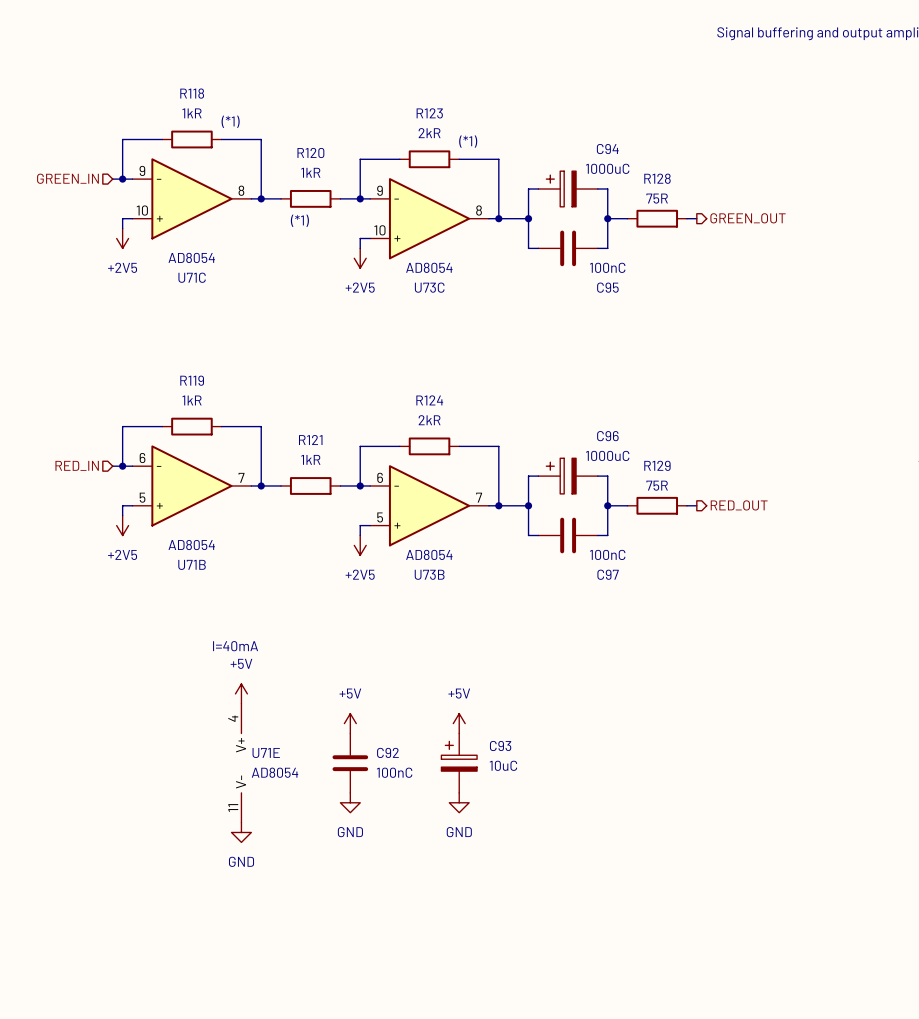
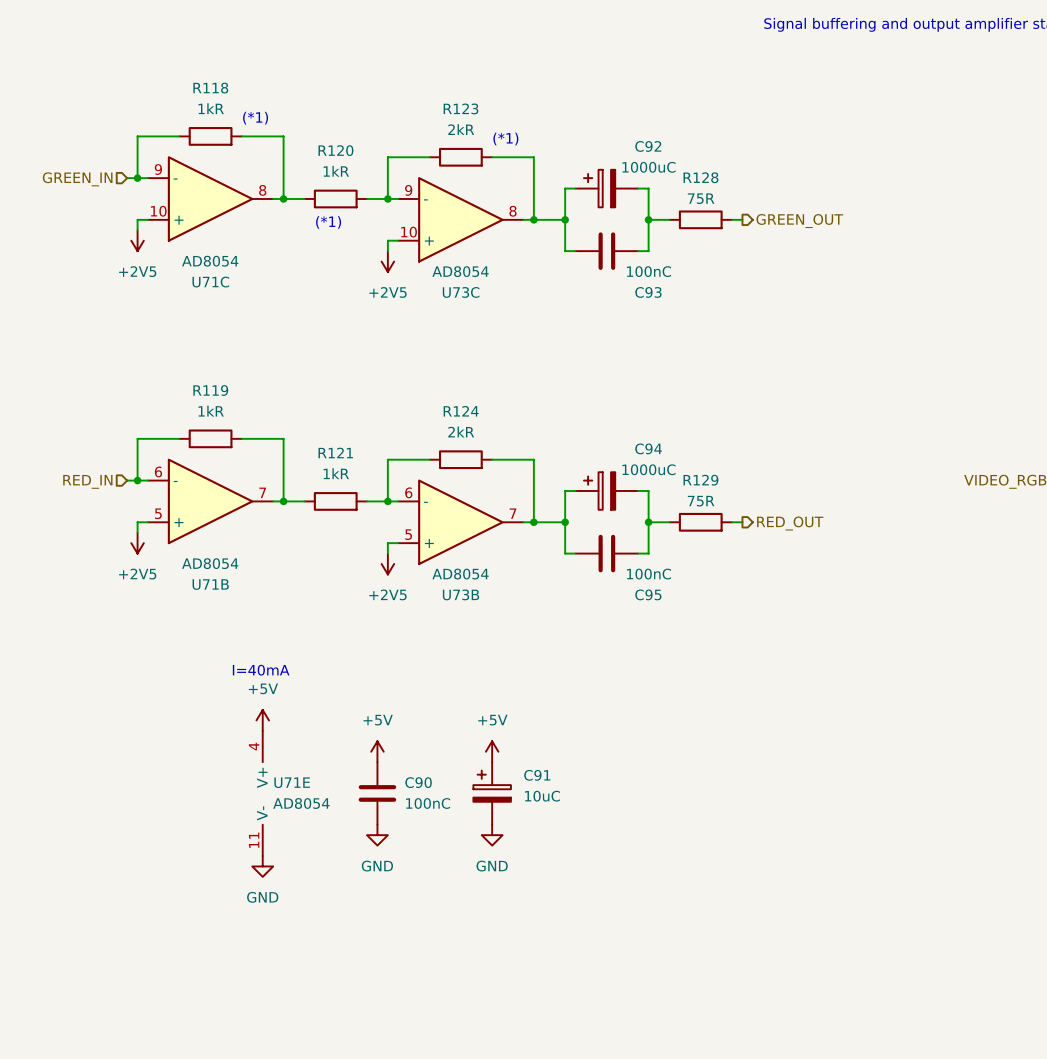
C94 name: C94 (607, 149) -> C92 (648, 146)
C95 name: C95 (607, 287) -> C93 (648, 292)
C96 name: C96 (607, 436) -> C94 (648, 448)
C97 name: C97 (608, 574) -> C95 (648, 594)
C93 name: C93 (500, 745) -> C91 (537, 775)
C92 name: C92 (387, 752) -> C90 (418, 782)

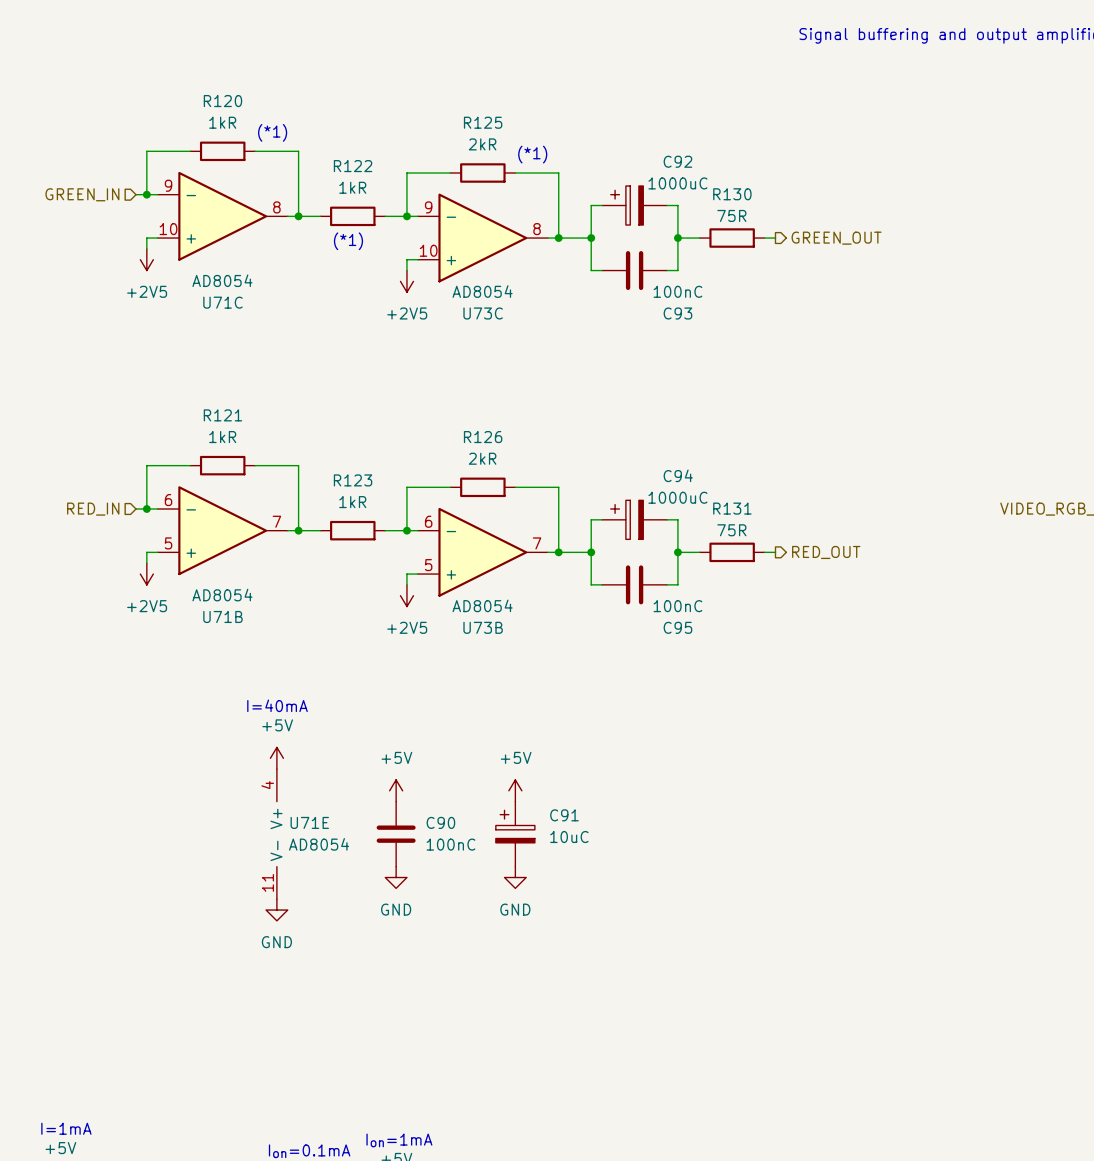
R118 name: R118 (210, 88) -> R120 (222, 101)
R123 name: R123 (461, 108) -> R125 (483, 122)
R120 name: R120 (335, 150) -> R122 (353, 166)
R128 name: R128 (700, 177) -> R130 (732, 194)
R119 name: R119 (210, 390) -> R121 (222, 415)
R124 name: R124 (461, 411) -> R126 (483, 437)
R121 name: R121 (335, 452) -> R123 (353, 480)
R129 name: R129 (700, 480) -> R131 (732, 508)

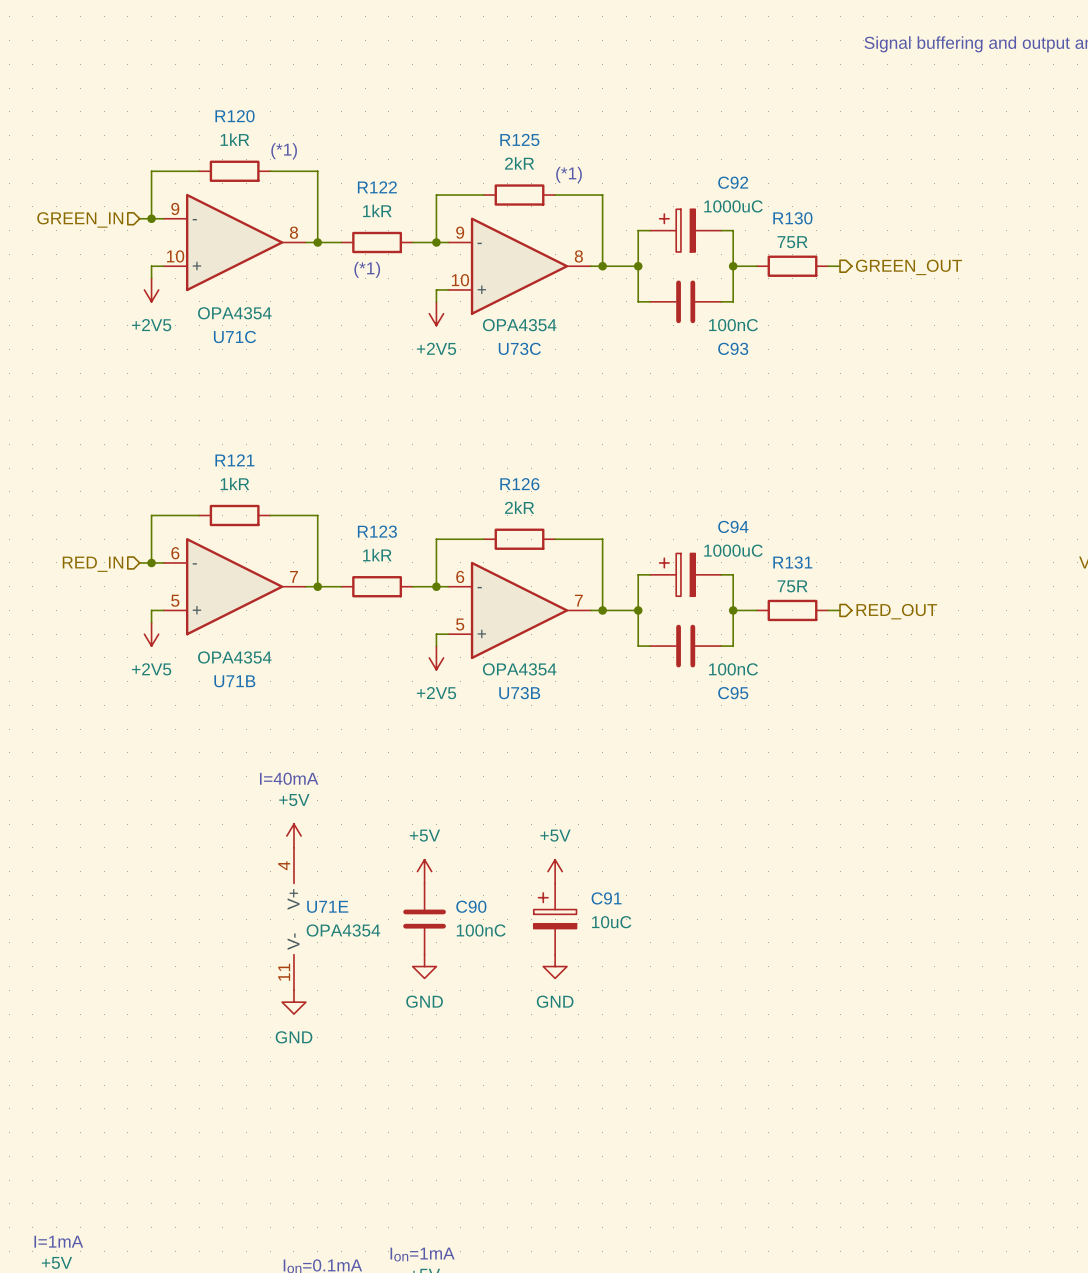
U71C value: AD8054 (222, 280) -> OPA4354 (234, 313)
U73C value: AD8054 (482, 291) -> OPA4354 (519, 325)
U71B value: AD8054 (222, 595) -> OPA4354 (234, 657)
U73B value: AD8054 (482, 605) -> OPA4354 (519, 669)
U71E value: AD8054 (319, 844) -> OPA4354 (343, 930)

